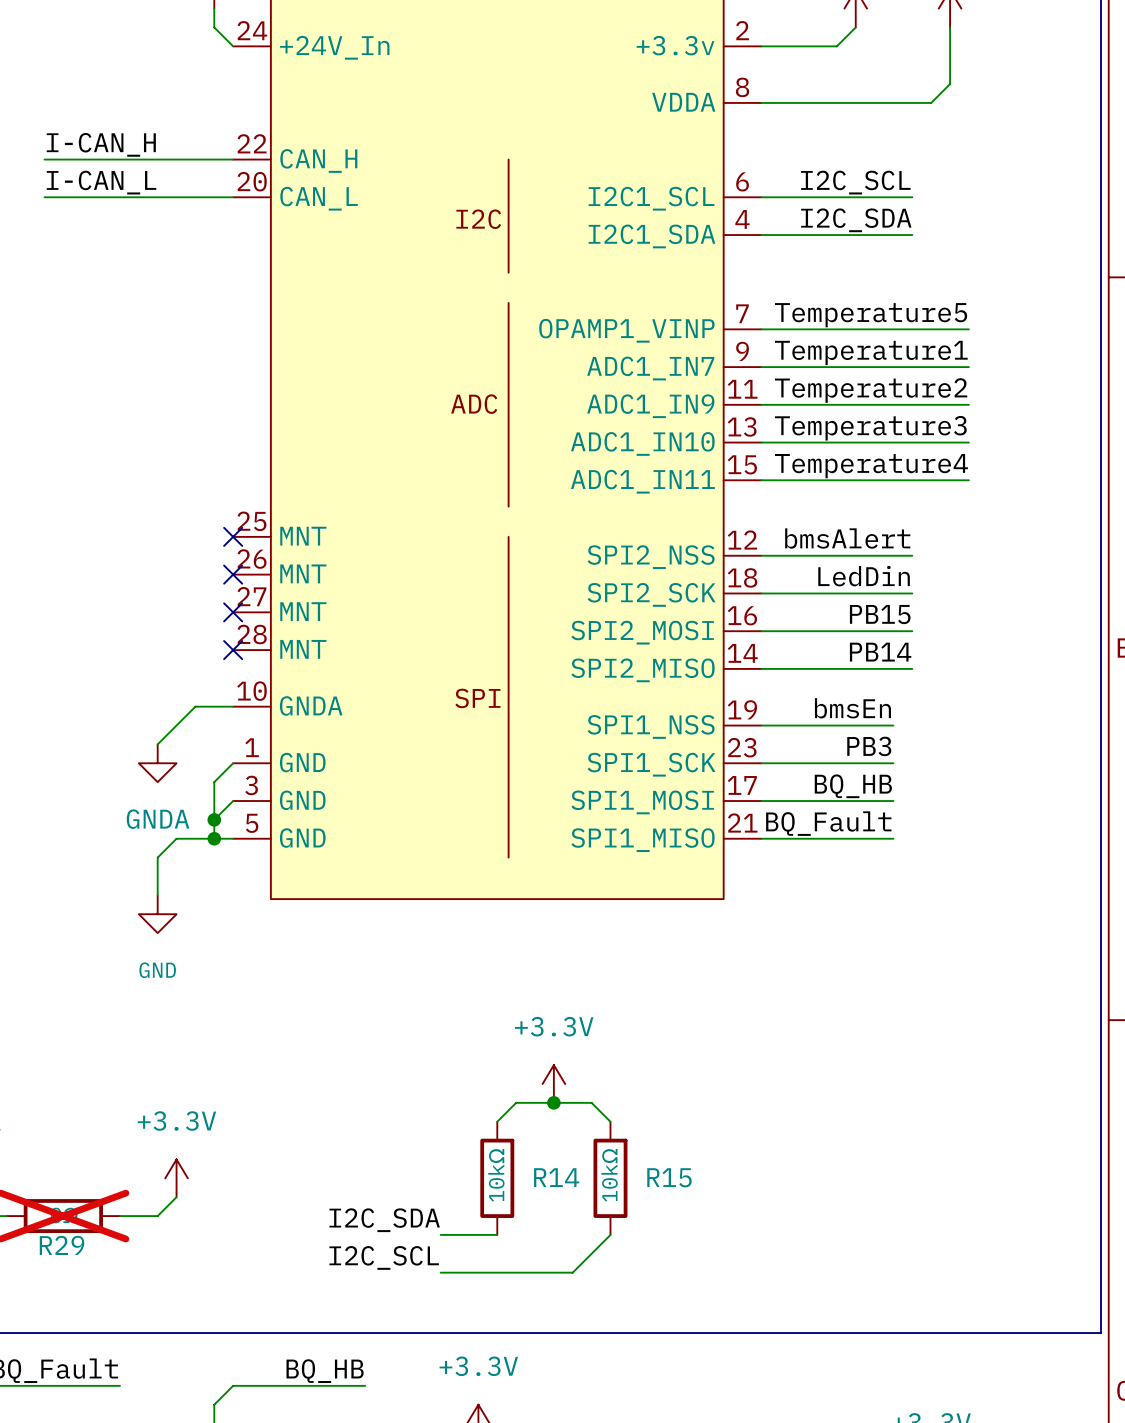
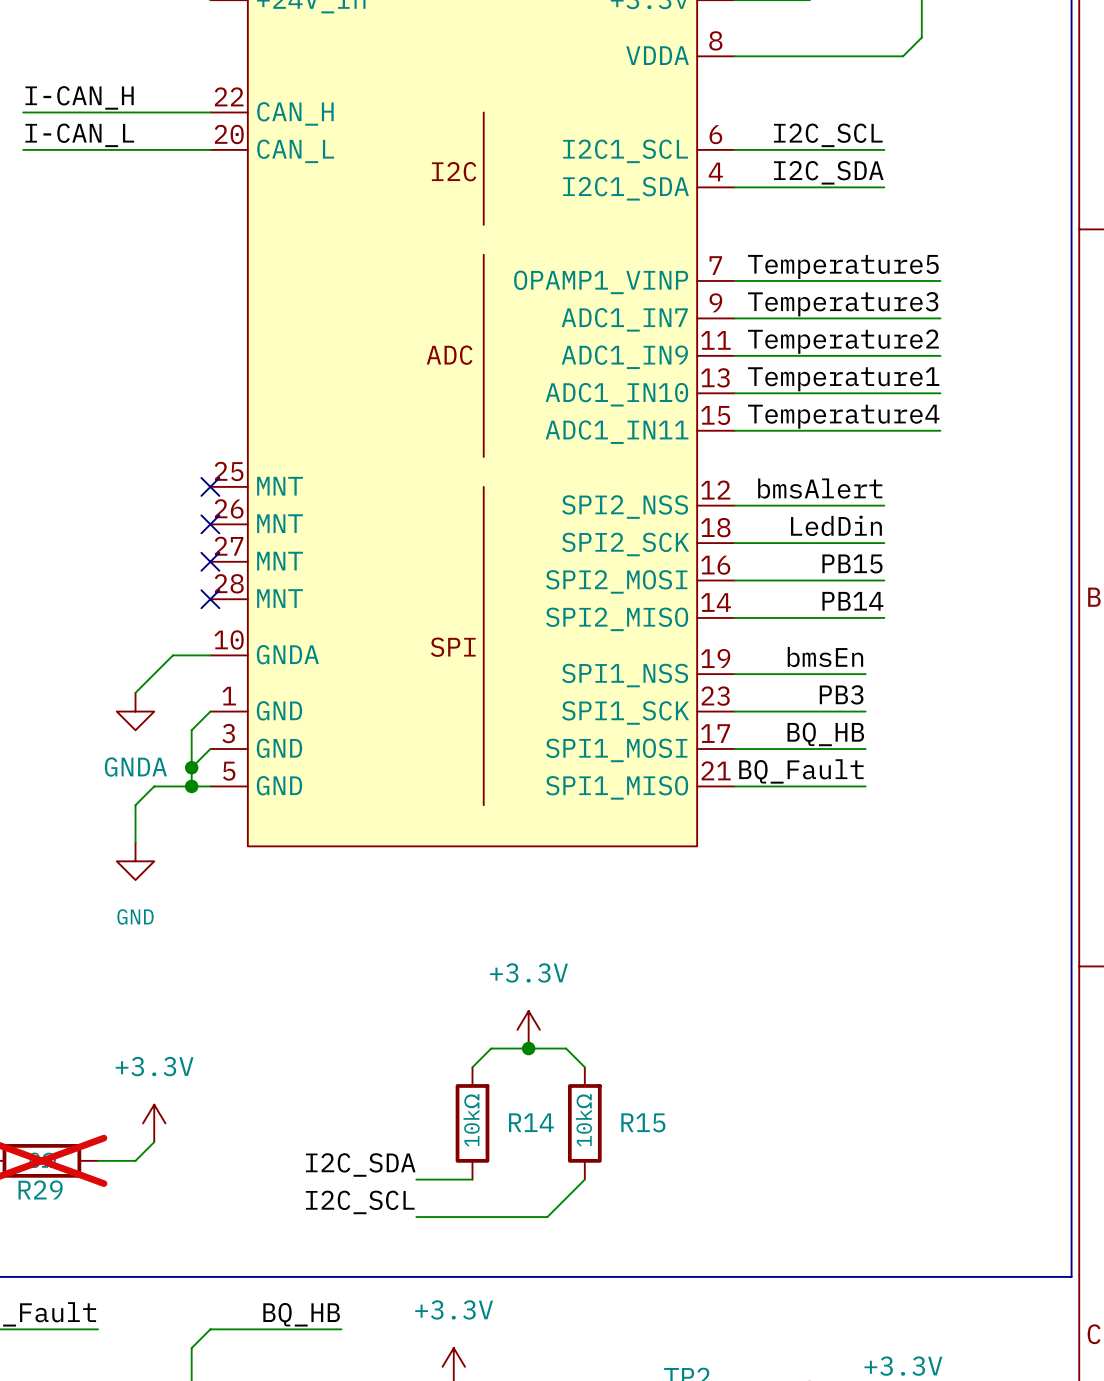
label: Temperature1 (871, 352) -> Temperature3 (843, 304)
label: Temperature3 (870, 428) -> Temperature1 (843, 379)

